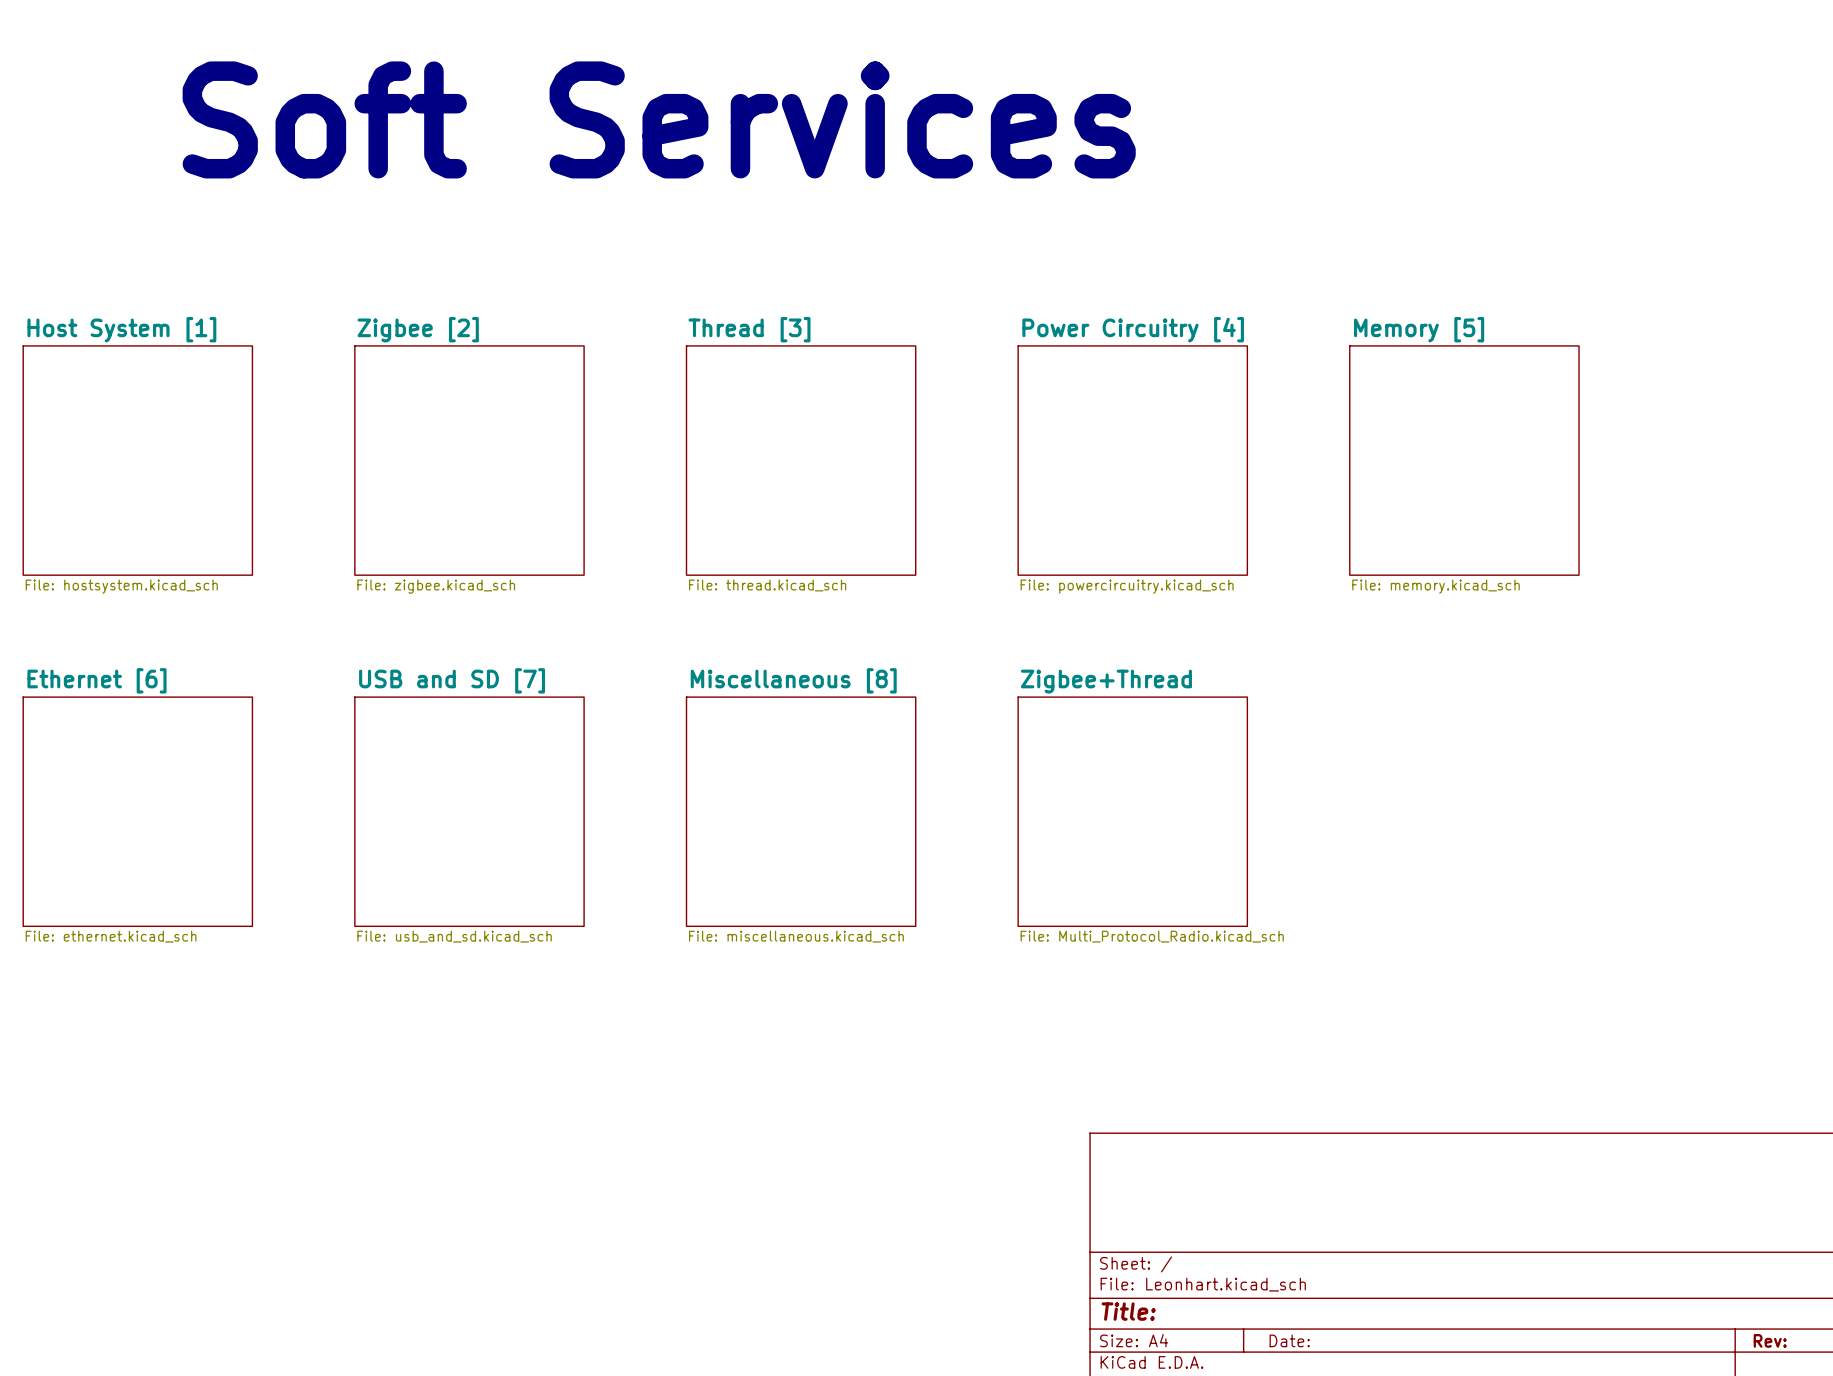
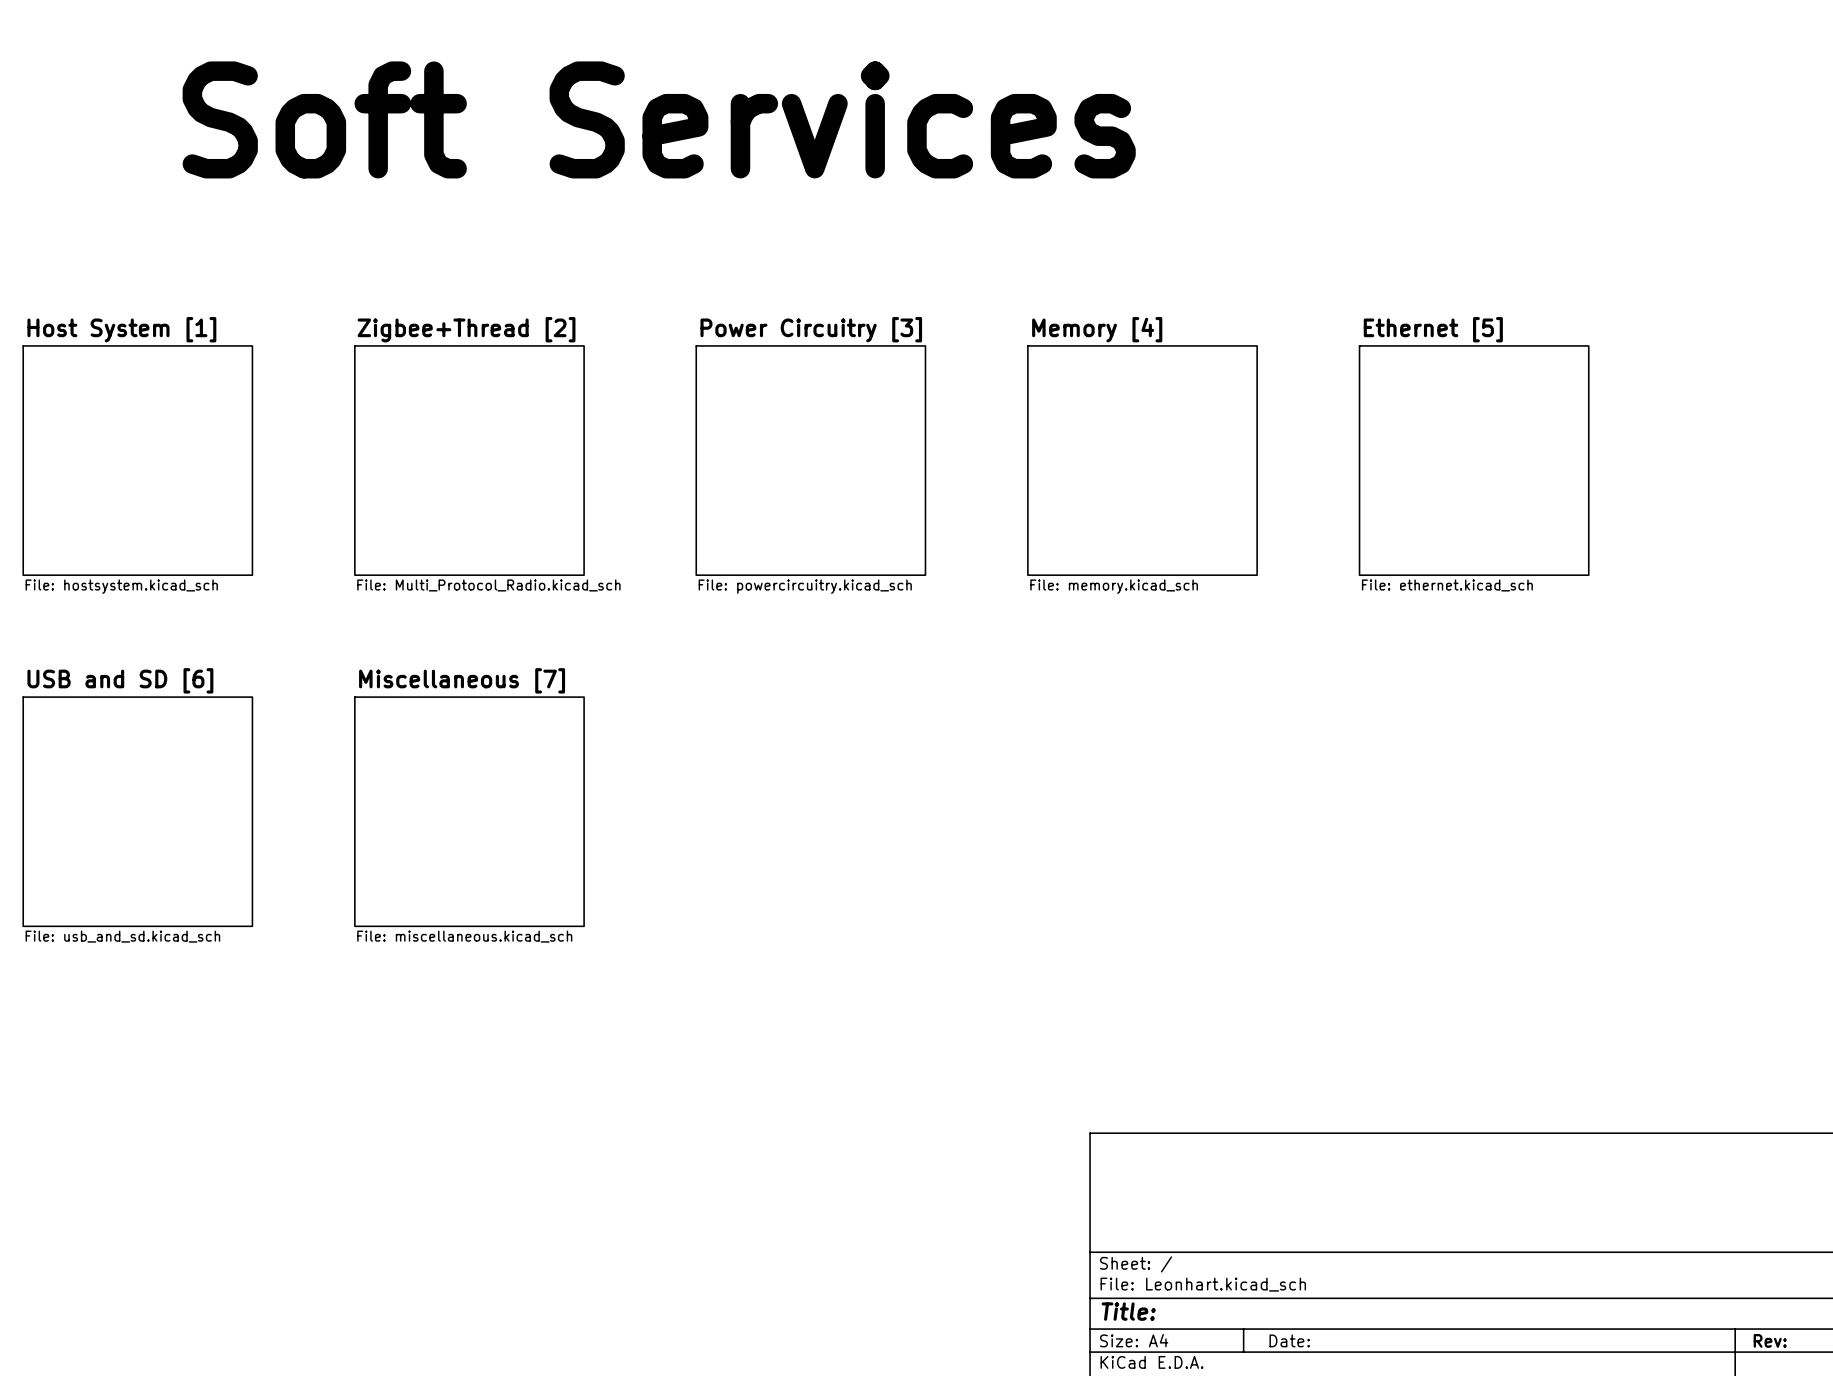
sheet Zigbee [2] name: Zigbee [2] (418, 329) -> Zigbee+Thread [2] (466, 329)
sheet Thread [3]: File: thread.kicad_sch (801, 460) -> none
sheet Power Circuitry [3]: none -> File: powercircuitry.kicad_sch (810, 460)
sheet Power Circuitry [4]: File: powercircuitry.kicad_sch (1132, 460) -> none
sheet Memory [4]: none -> File: memory.kicad_sch (1142, 460)
sheet Memory [5]: File: memory.kicad_sch (1464, 460) -> none
sheet Ethernet [5]: none -> File: ethernet.kicad_sch (1474, 460)
sheet Zigbee [2] value: File: zigbee.kicad_sch (436, 586) -> File: Multi_Protocol_Radio.kicad_sch (488, 585)
sheet Ethernet [6] name: Ethernet [6] (96, 680) -> USB and SD [6] (120, 680)
sheet USB and SD [7] name: USB and SD [7] (452, 680) -> Miscellaneous [7] (462, 680)
sheet Miscellaneous [8]: File: miscellaneous.kicad_sch (801, 811) -> none
sheet Zigbee+Thread: File: Multi_Protocol_Radio.kicad_sch (1132, 811) -> none
sheet Ethernet [6] value: File: ethernet.kicad_sch (111, 936) -> File: usb_and_sd.kicad_sch (122, 936)
sheet USB and SD [7] value: File: usb_and_sd.kicad_sch (454, 936) -> File: miscellaneous.kicad_sch (464, 936)

